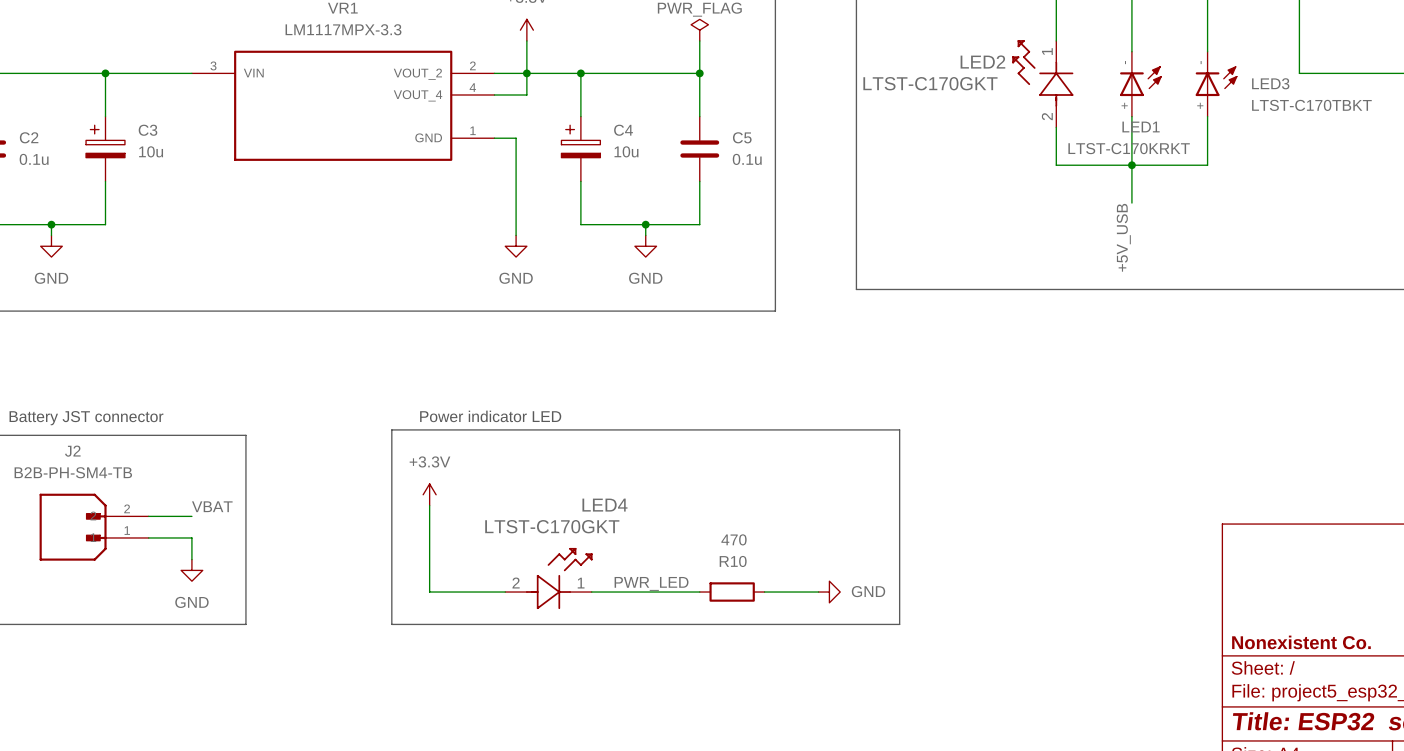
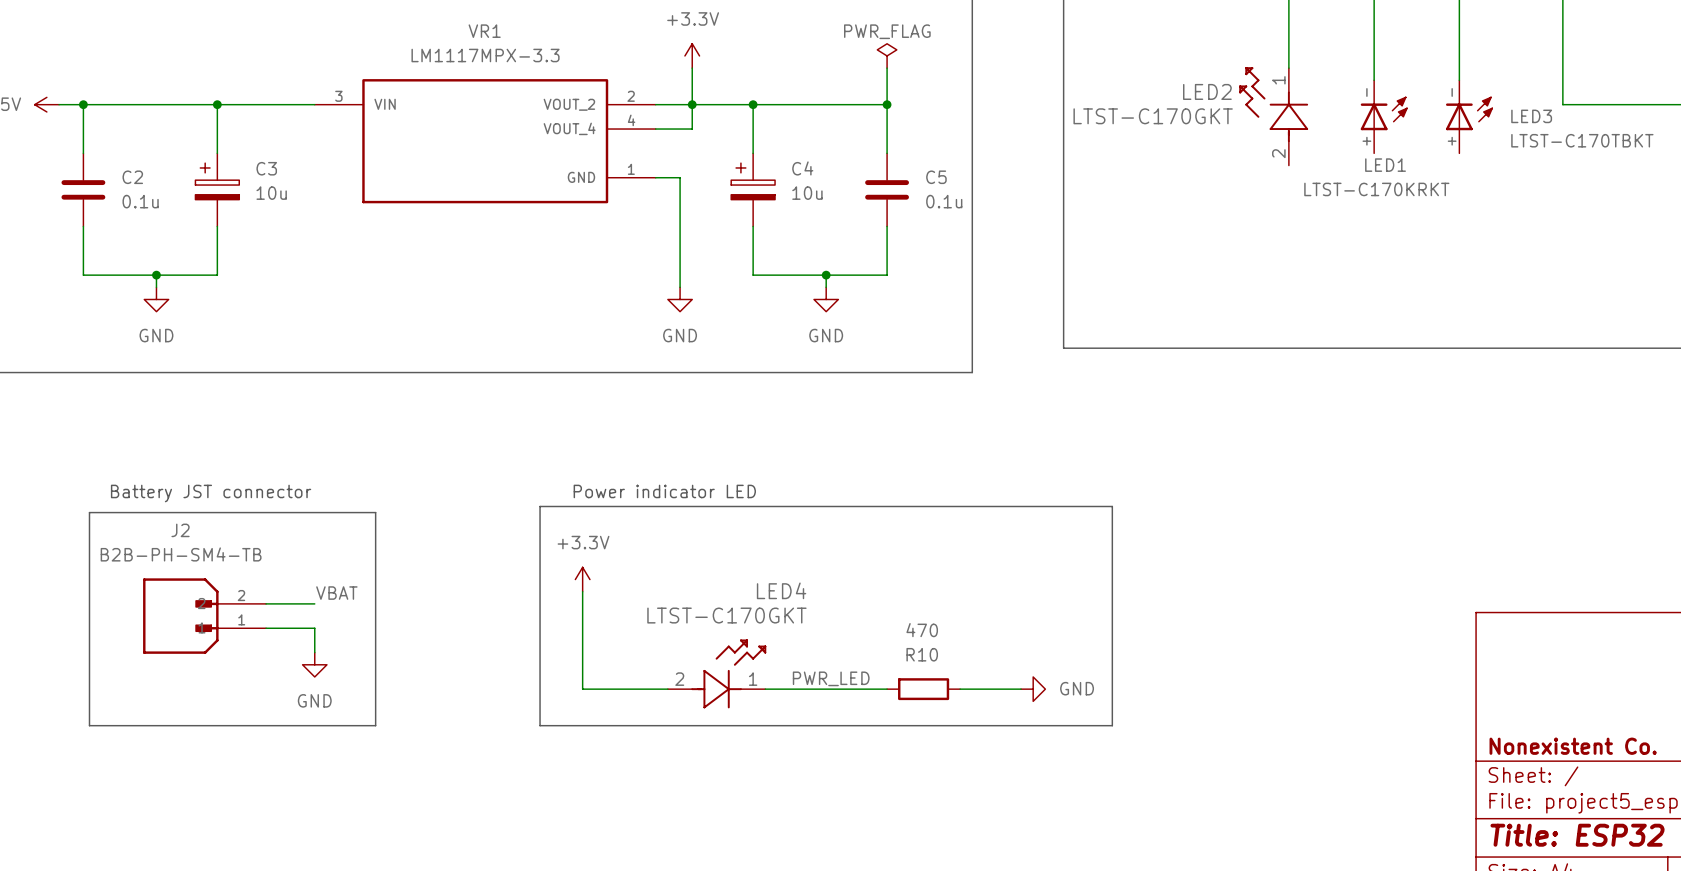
wire: (1131, 116) (1131, 203) -> none
wire: (1207, 116) (1207, 165) (1056, 165) (1056, 127) -> none
junction: (1131, 165) -> none
label: +5V_USB (1123, 237) -> none

